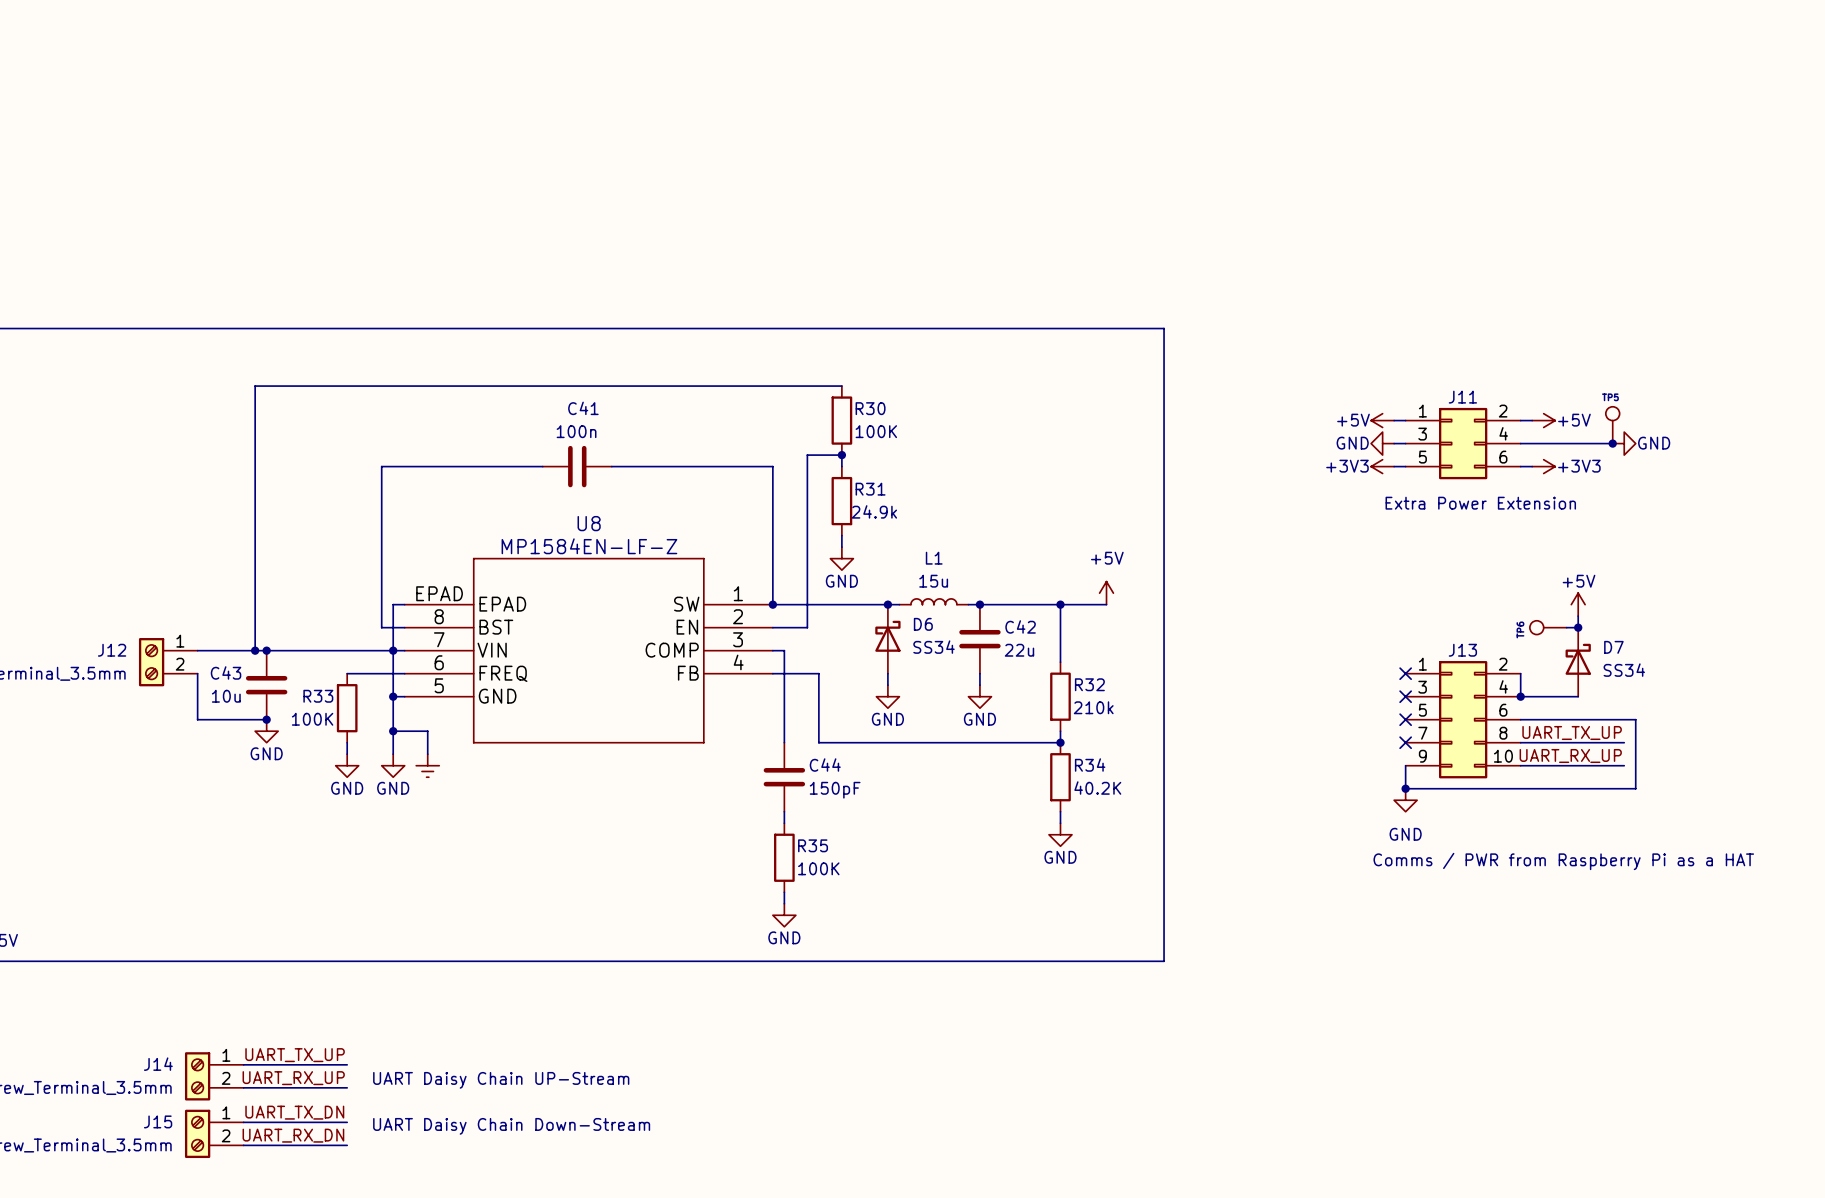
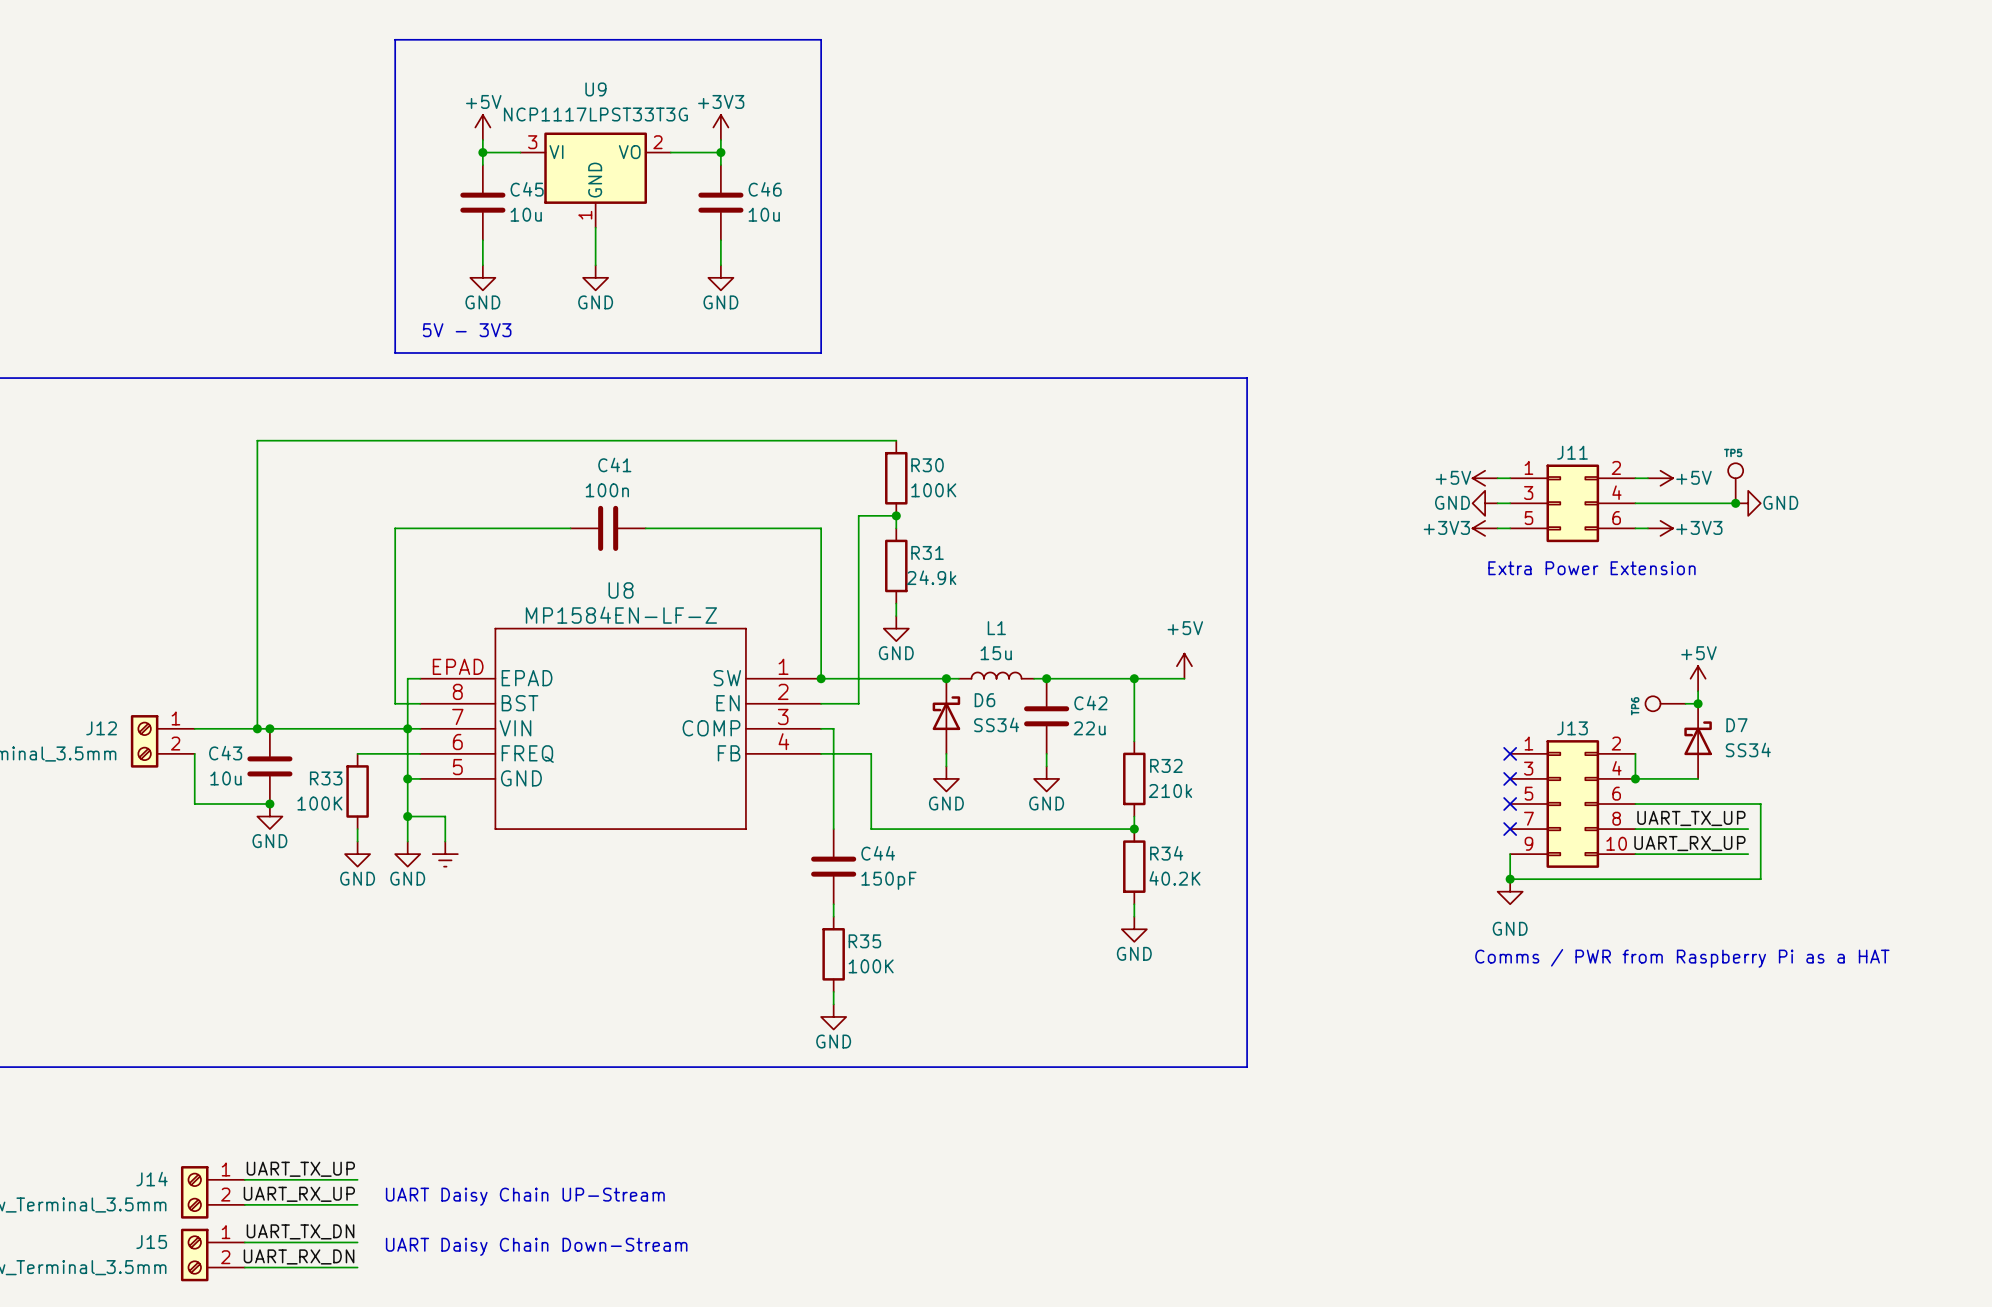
line: none -> (395, 39) (821, 39) (821, 352) (395, 352) (395, 39)
power symbol: none -> +5V (482, 127)
power symbol: none -> +3V3 (720, 127)
wire: none -> (482, 140) (482, 165)
wire: none -> (720, 140) (720, 165)
wire: none -> (482, 152) (520, 152)
junction: none -> (482, 152)
wire: none -> (670, 152) (720, 152)
junction: none -> (720, 152)
U9: none -> NCP1117LPST33T3G (595, 180)
C45: none -> 10u (482, 202)
C46: none -> 10u (720, 202)
wire: none -> (595, 227) (595, 265)
wire: none -> (482, 240) (482, 265)
wire: none -> (720, 240) (720, 265)
power symbol: none -> GND (482, 277)
power symbol: none -> GND (595, 277)
power symbol: none -> GND (720, 277)
text: none -> 5V - 3V3 (467, 330)

